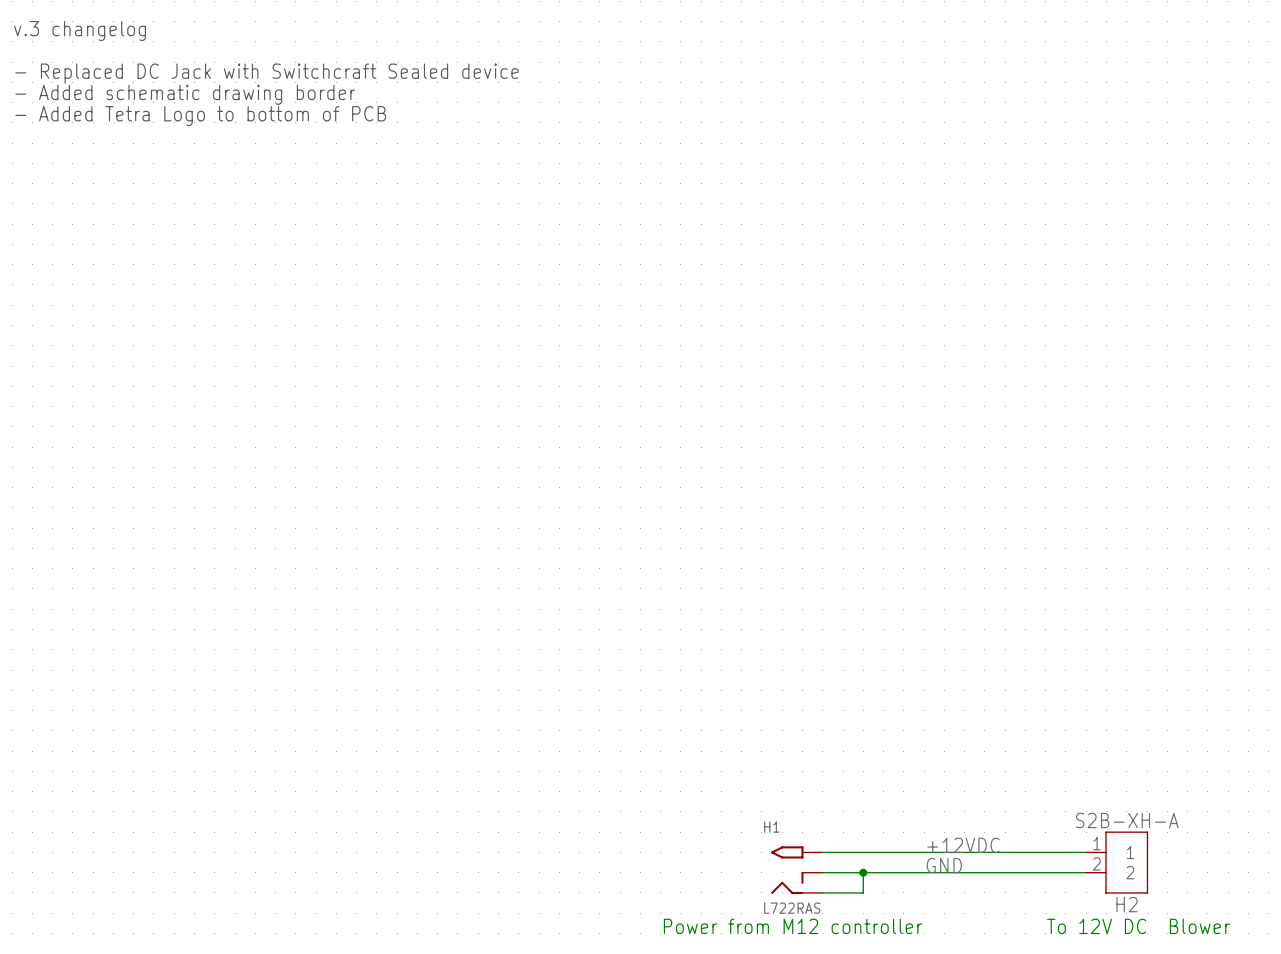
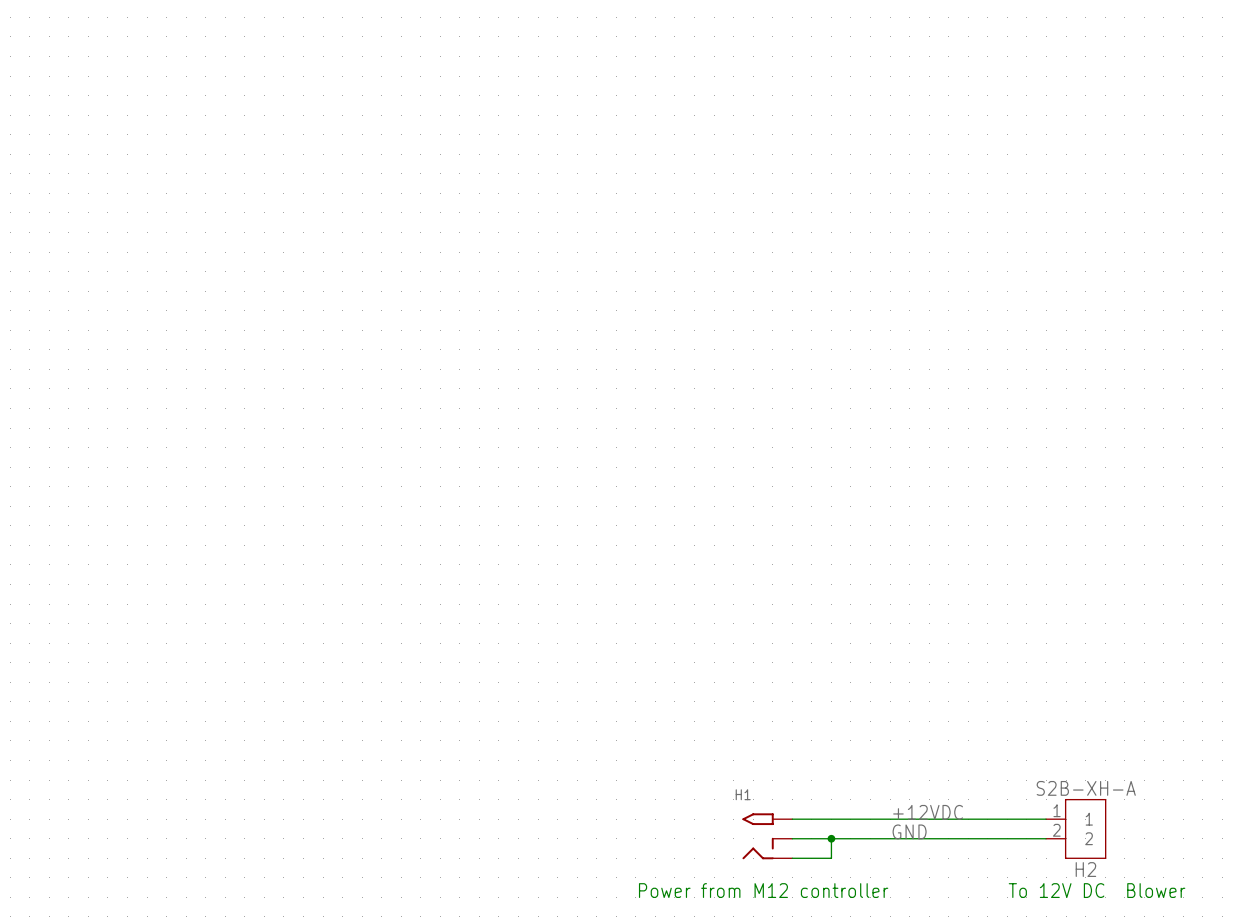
text: v.3 changelog (80, 30) -> none
text: - Replaced DC Jack with Switchcraft Sealed device (266, 73) -> none
text: - Added schematic drawing border (185, 94) -> none
text: - Added Tetra Logo to bottom of PCB (200, 116) -> none
H1 value: L722RAS (792, 908) -> none

